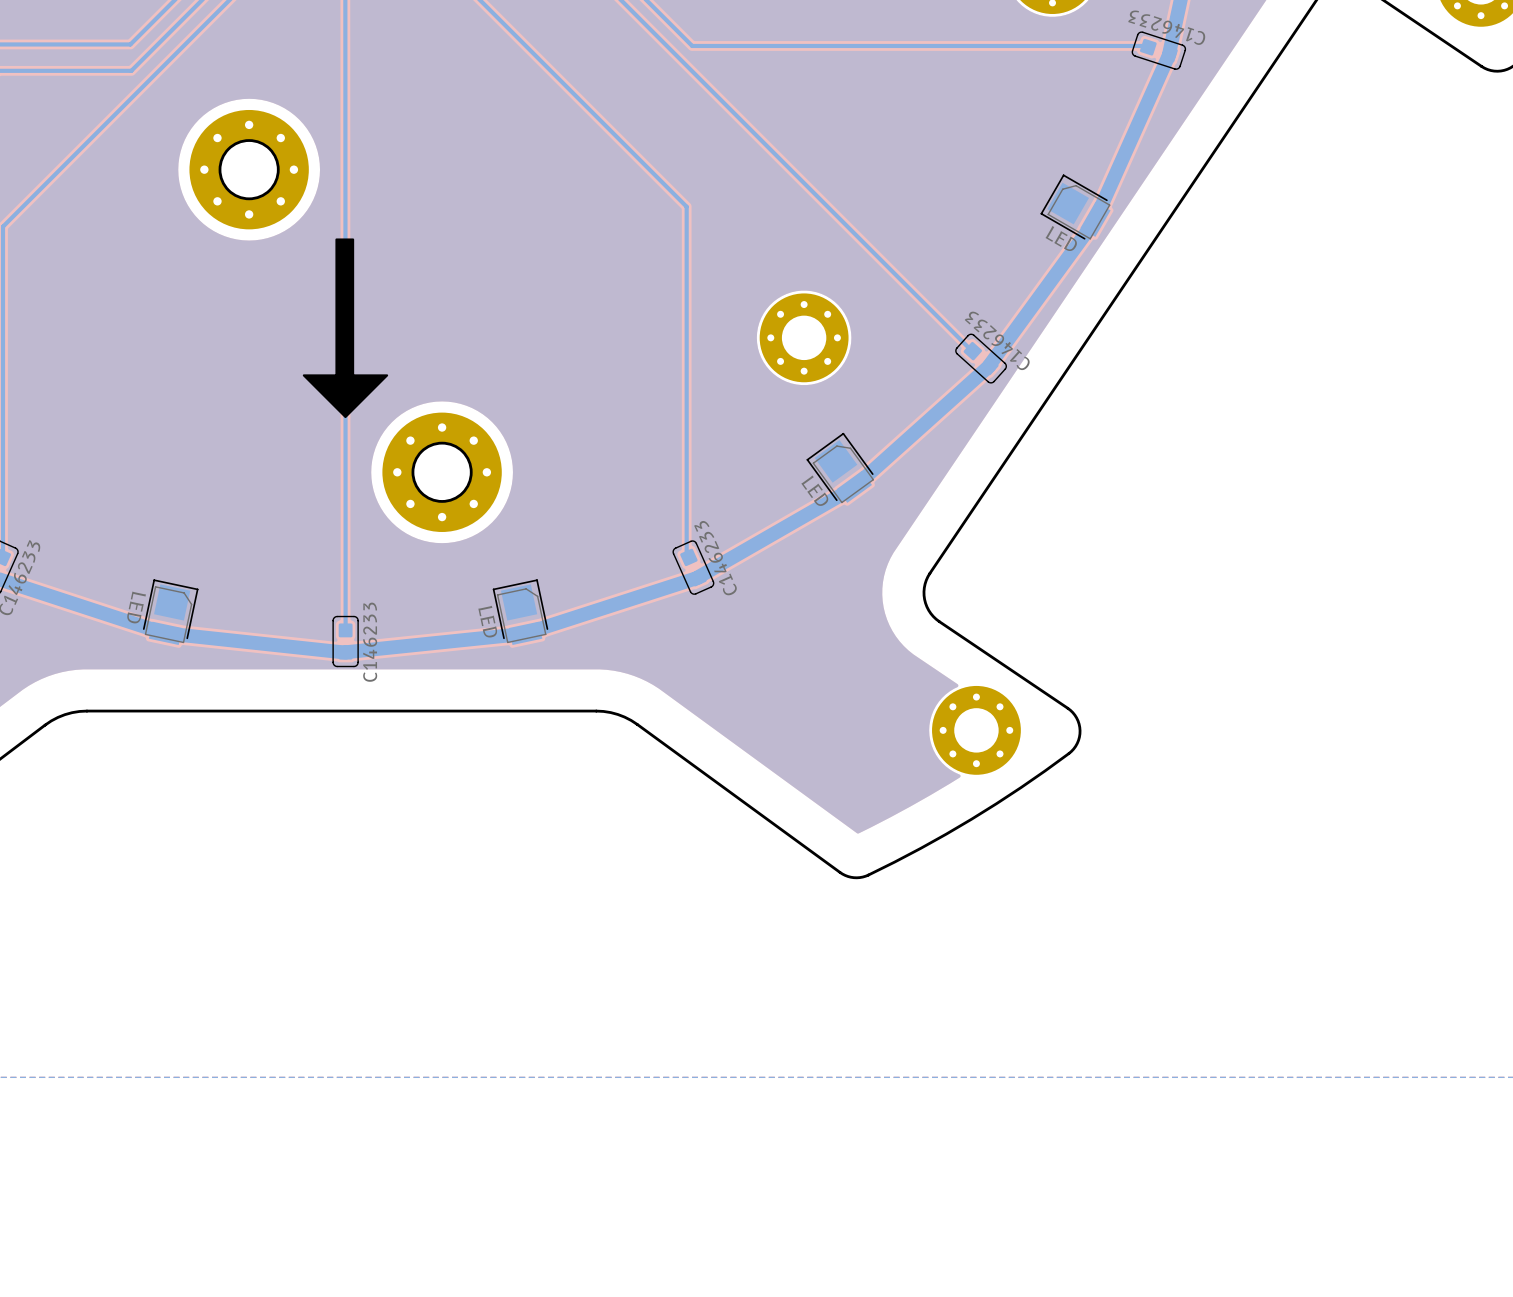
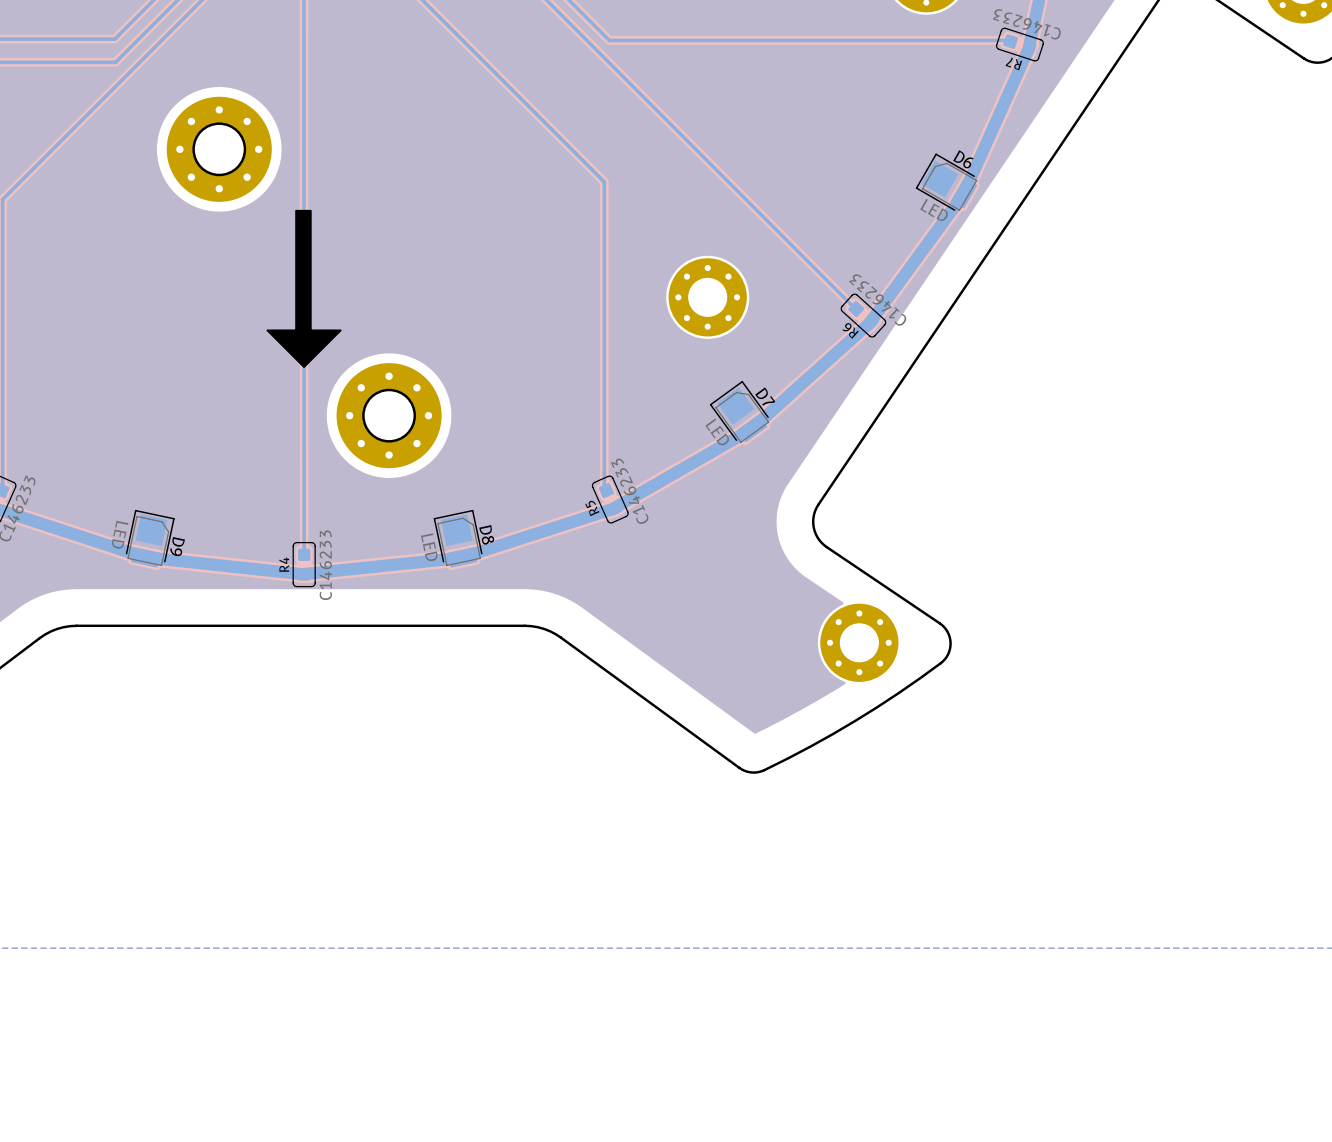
R7 name: none -> R7 (1013, 63)
D6 name: none -> D6 (963, 159)
R6 name: none -> R6 (850, 330)
D7 name: none -> D7 (765, 396)
R5 name: none -> R5 (592, 508)
D8 name: none -> D8 (486, 534)
D9 name: none -> D9 (177, 546)
R4 name: none -> R4 (284, 564)

